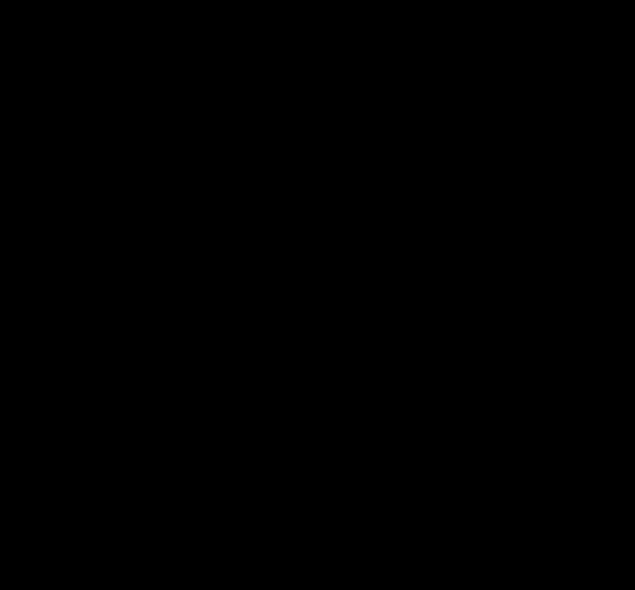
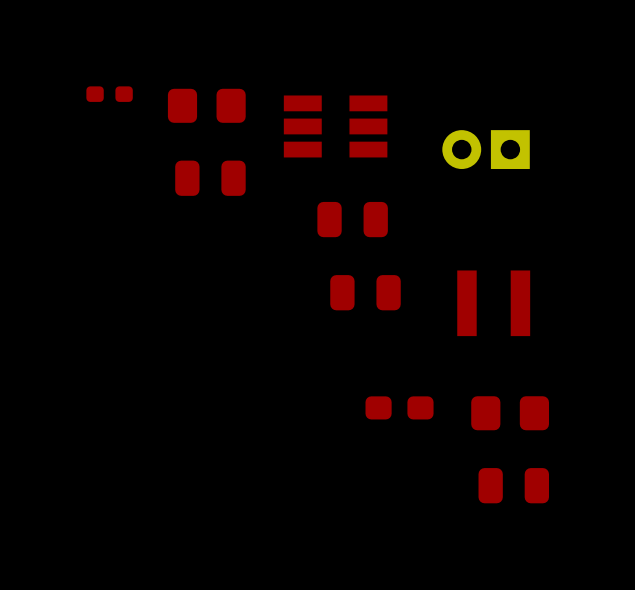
part: none -> (109, 94)
part: none -> (206, 105)
part: none -> (335, 126)
part: none -> (486, 149)
part: none -> (210, 178)
part: none -> (352, 219)
part: none -> (365, 292)
part: none -> (493, 303)
part: none -> (399, 407)
part: none -> (510, 413)
part: none -> (513, 485)

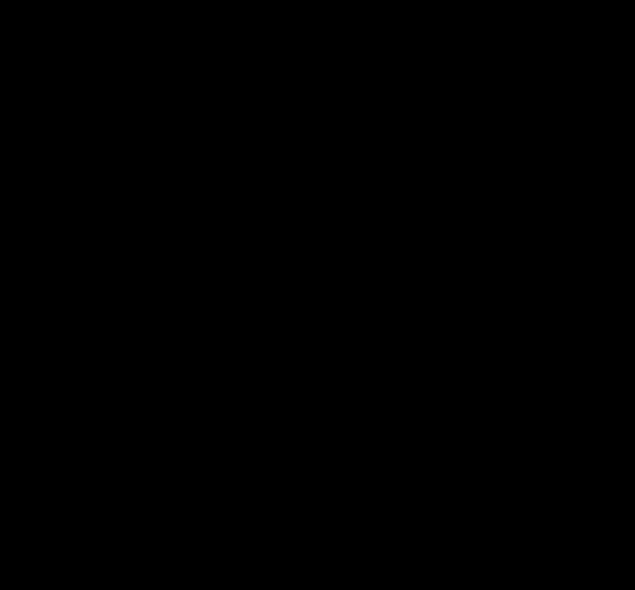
part: (109, 94) -> none
part: (206, 105) -> none
part: (335, 126) -> none
part: (486, 149) -> none
part: (210, 178) -> none
part: (352, 219) -> none
part: (365, 292) -> none
part: (493, 303) -> none
part: (399, 407) -> none
part: (510, 413) -> none
part: (513, 485) -> none

